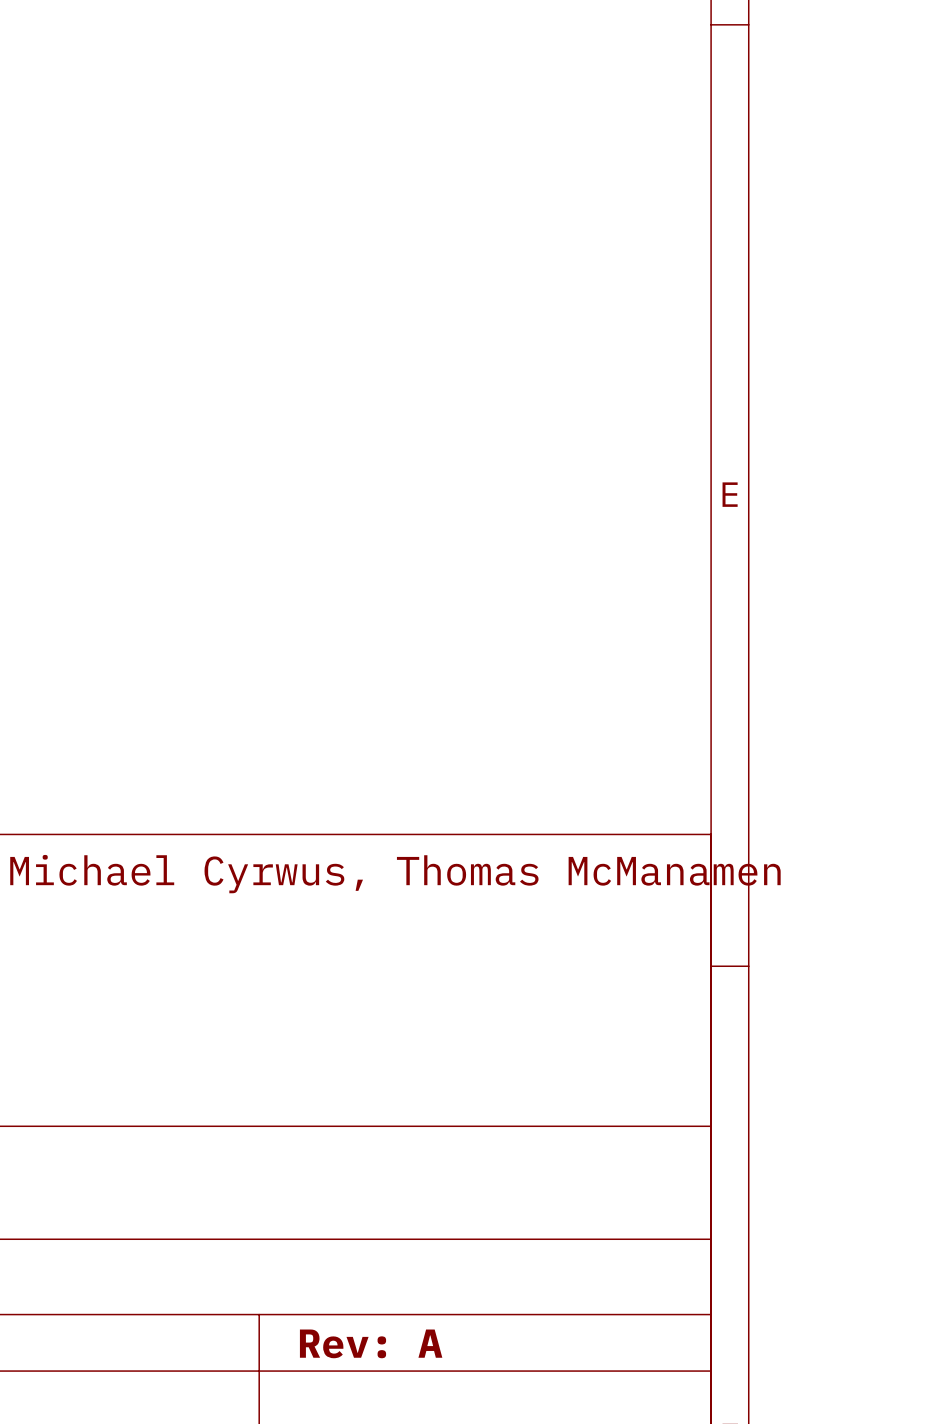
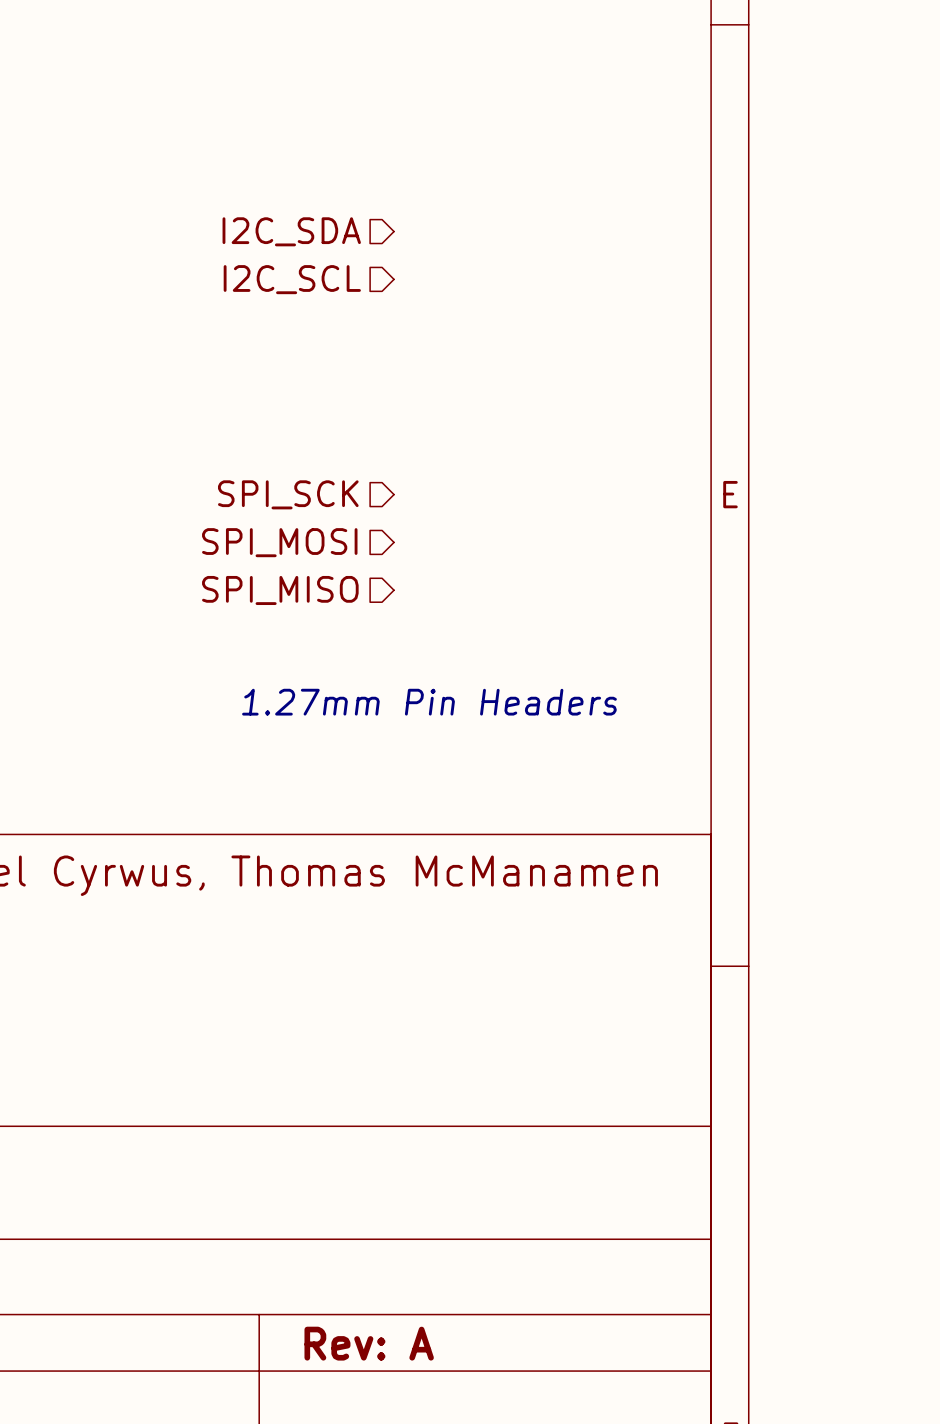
hierarchical label: none -> I2C_SDA (291, 231)
hierarchical label: none -> I2C_SCL (292, 279)
hierarchical label: none -> SPI_SCK (288, 494)
hierarchical label: none -> SPI_MOSI (279, 542)
hierarchical label: none -> SPI_MISO (280, 590)
text: none -> 1.27mm Pin Headers (429, 702)

